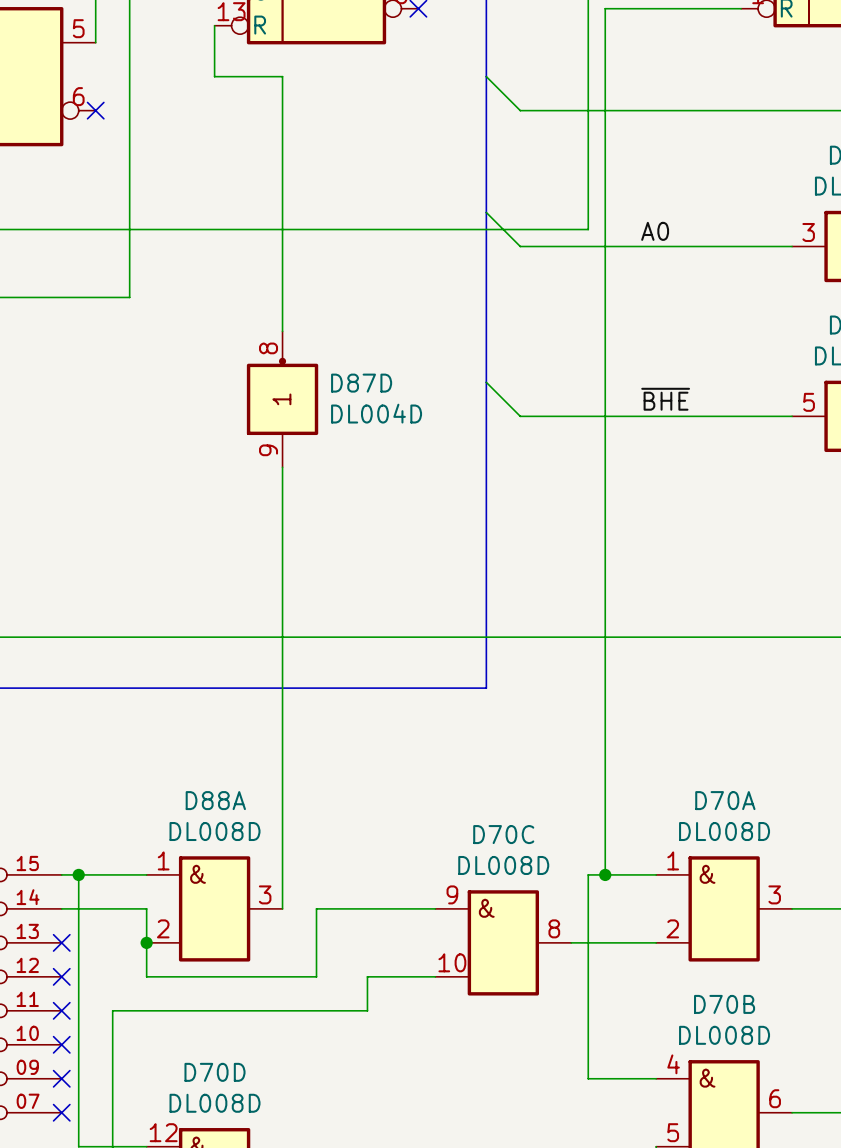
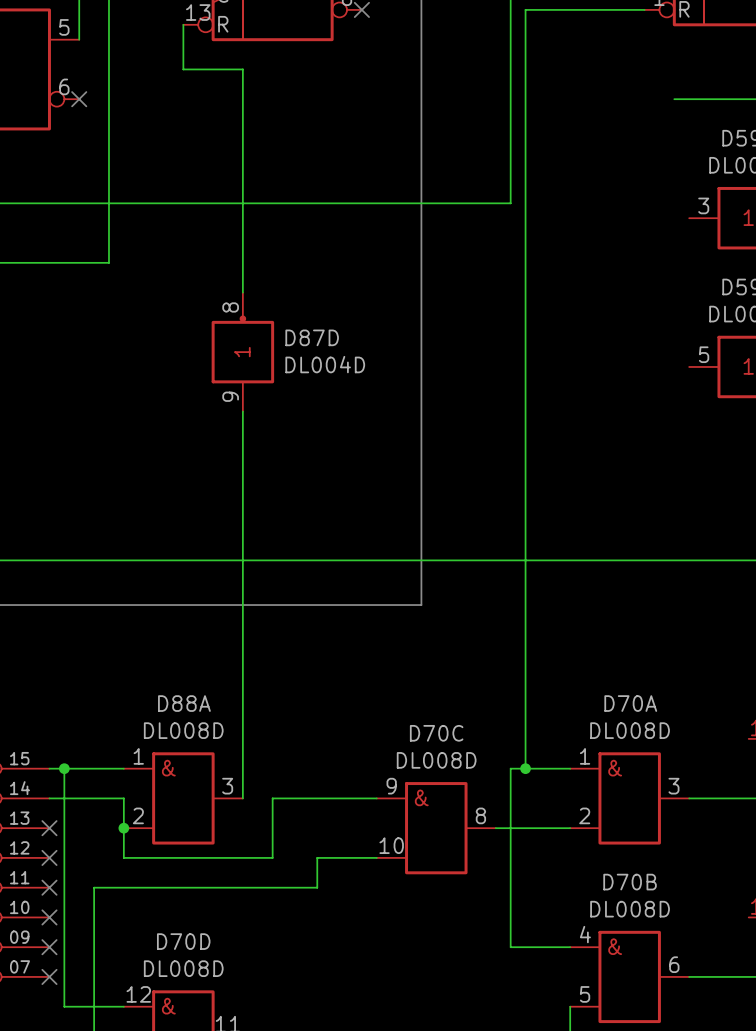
wire: (486, 76) (520, 110) (775, 110) -> none
wire: (486, 212) (520, 246) (792, 246) -> none
label: A0 (655, 231) -> none
wire: (486, 382) (520, 416) (792, 416) -> none
label: ~{BHE} (665, 399) -> none

